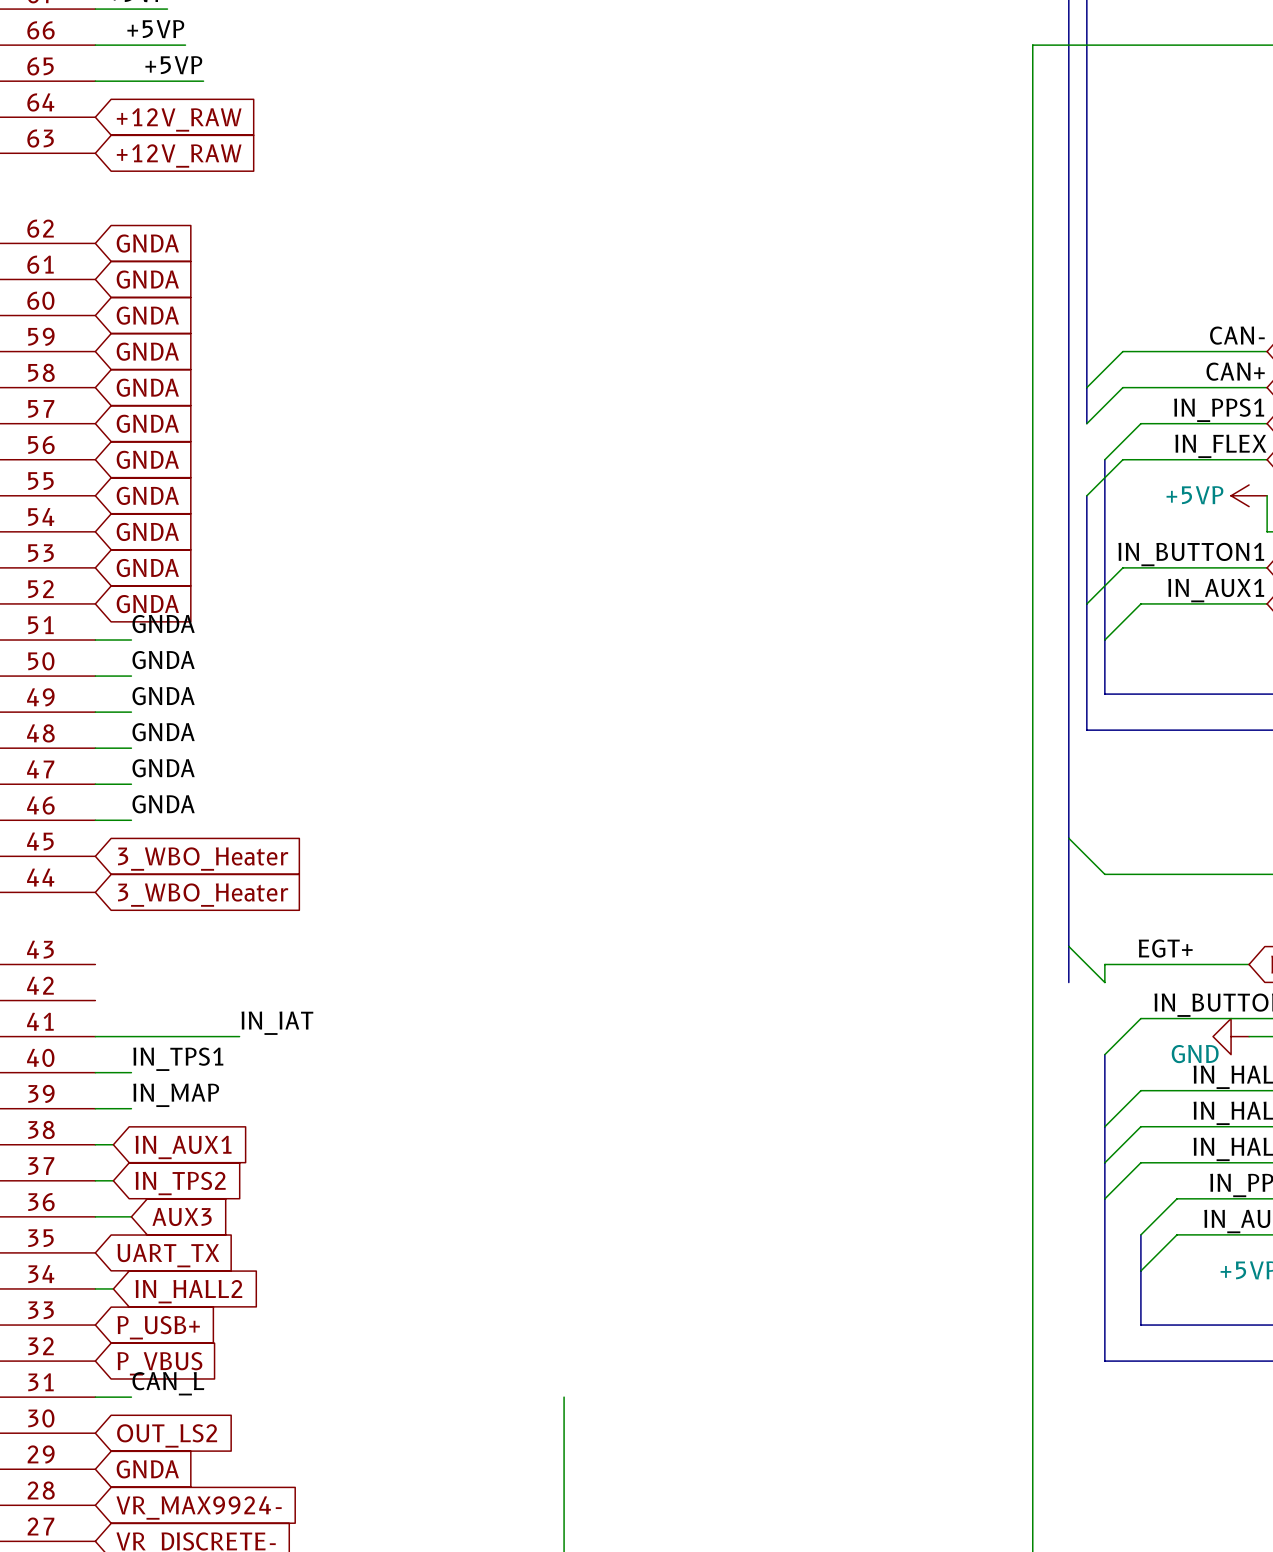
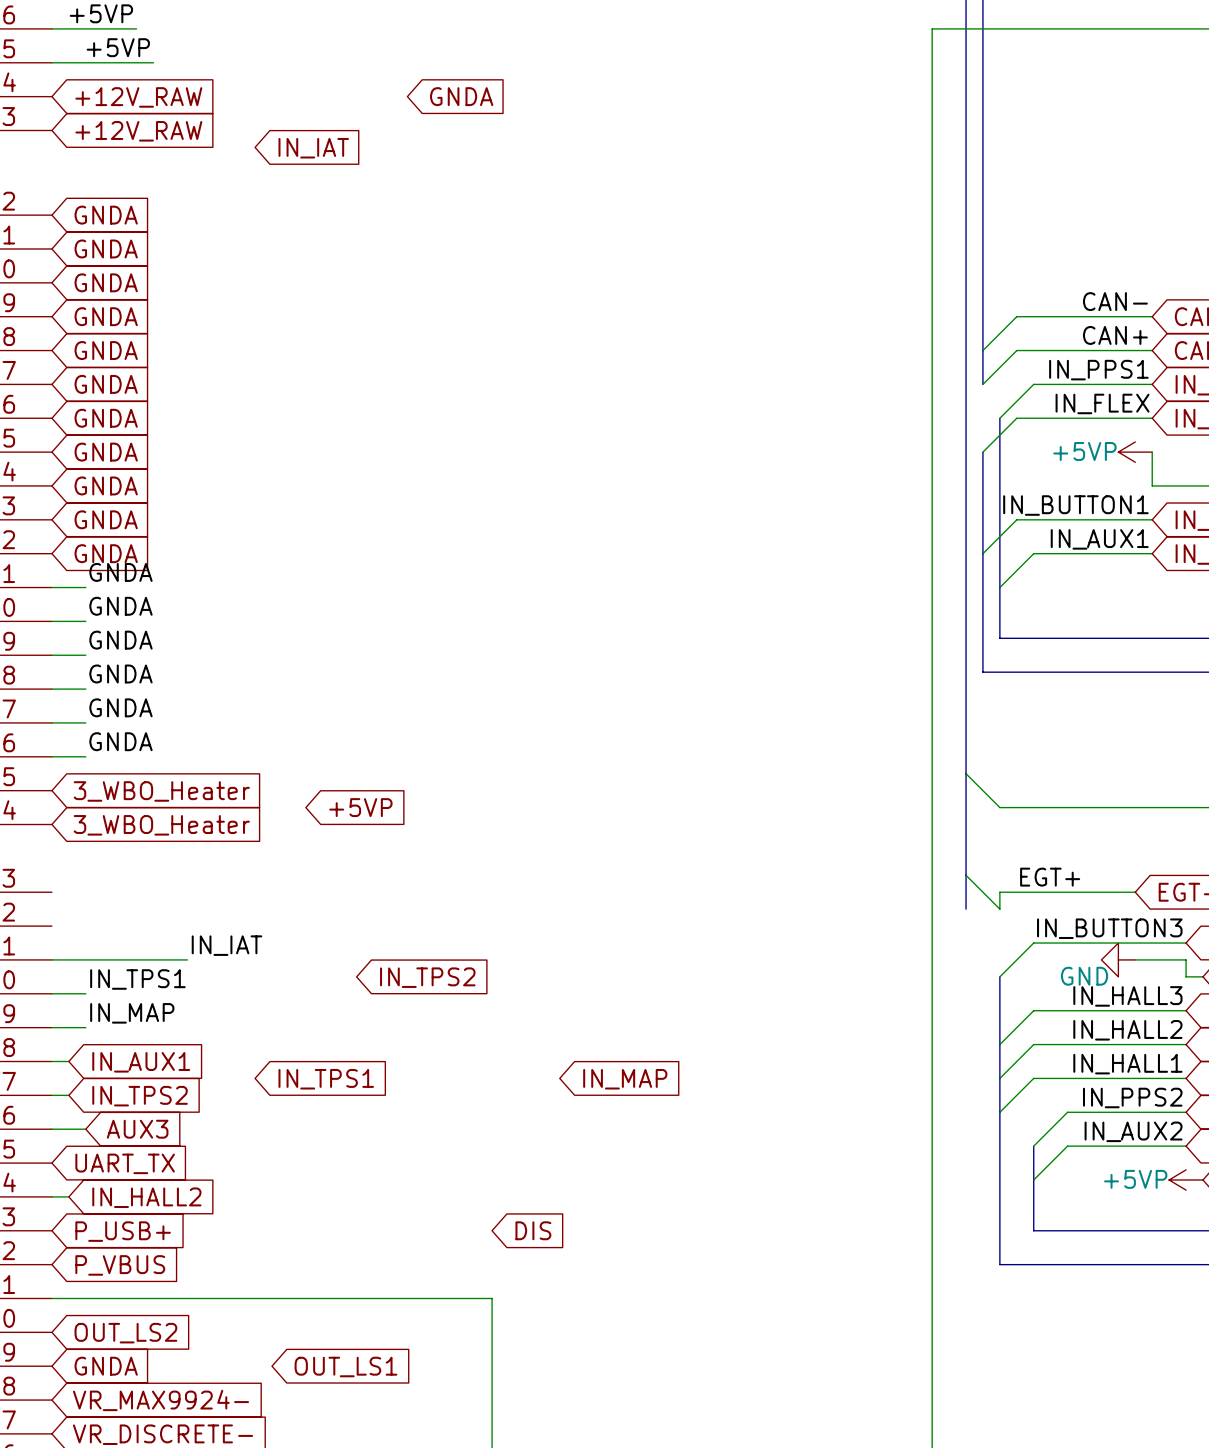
global label: none -> GNDA (461, 96)
global label: none -> IN_IAT (313, 148)
global label: none -> +5VP (360, 807)
global label: none -> IN_TPS2 (427, 977)
global label: none -> IN_TPS1 (326, 1079)
global label: none -> IN_MAP (625, 1079)
global label: none -> DIS (533, 1230)
label: CAN_L (168, 1383) -> none
wire: none -> (85, 1298) (492, 1298)
global label: none -> OUT_LS1 (345, 1367)

